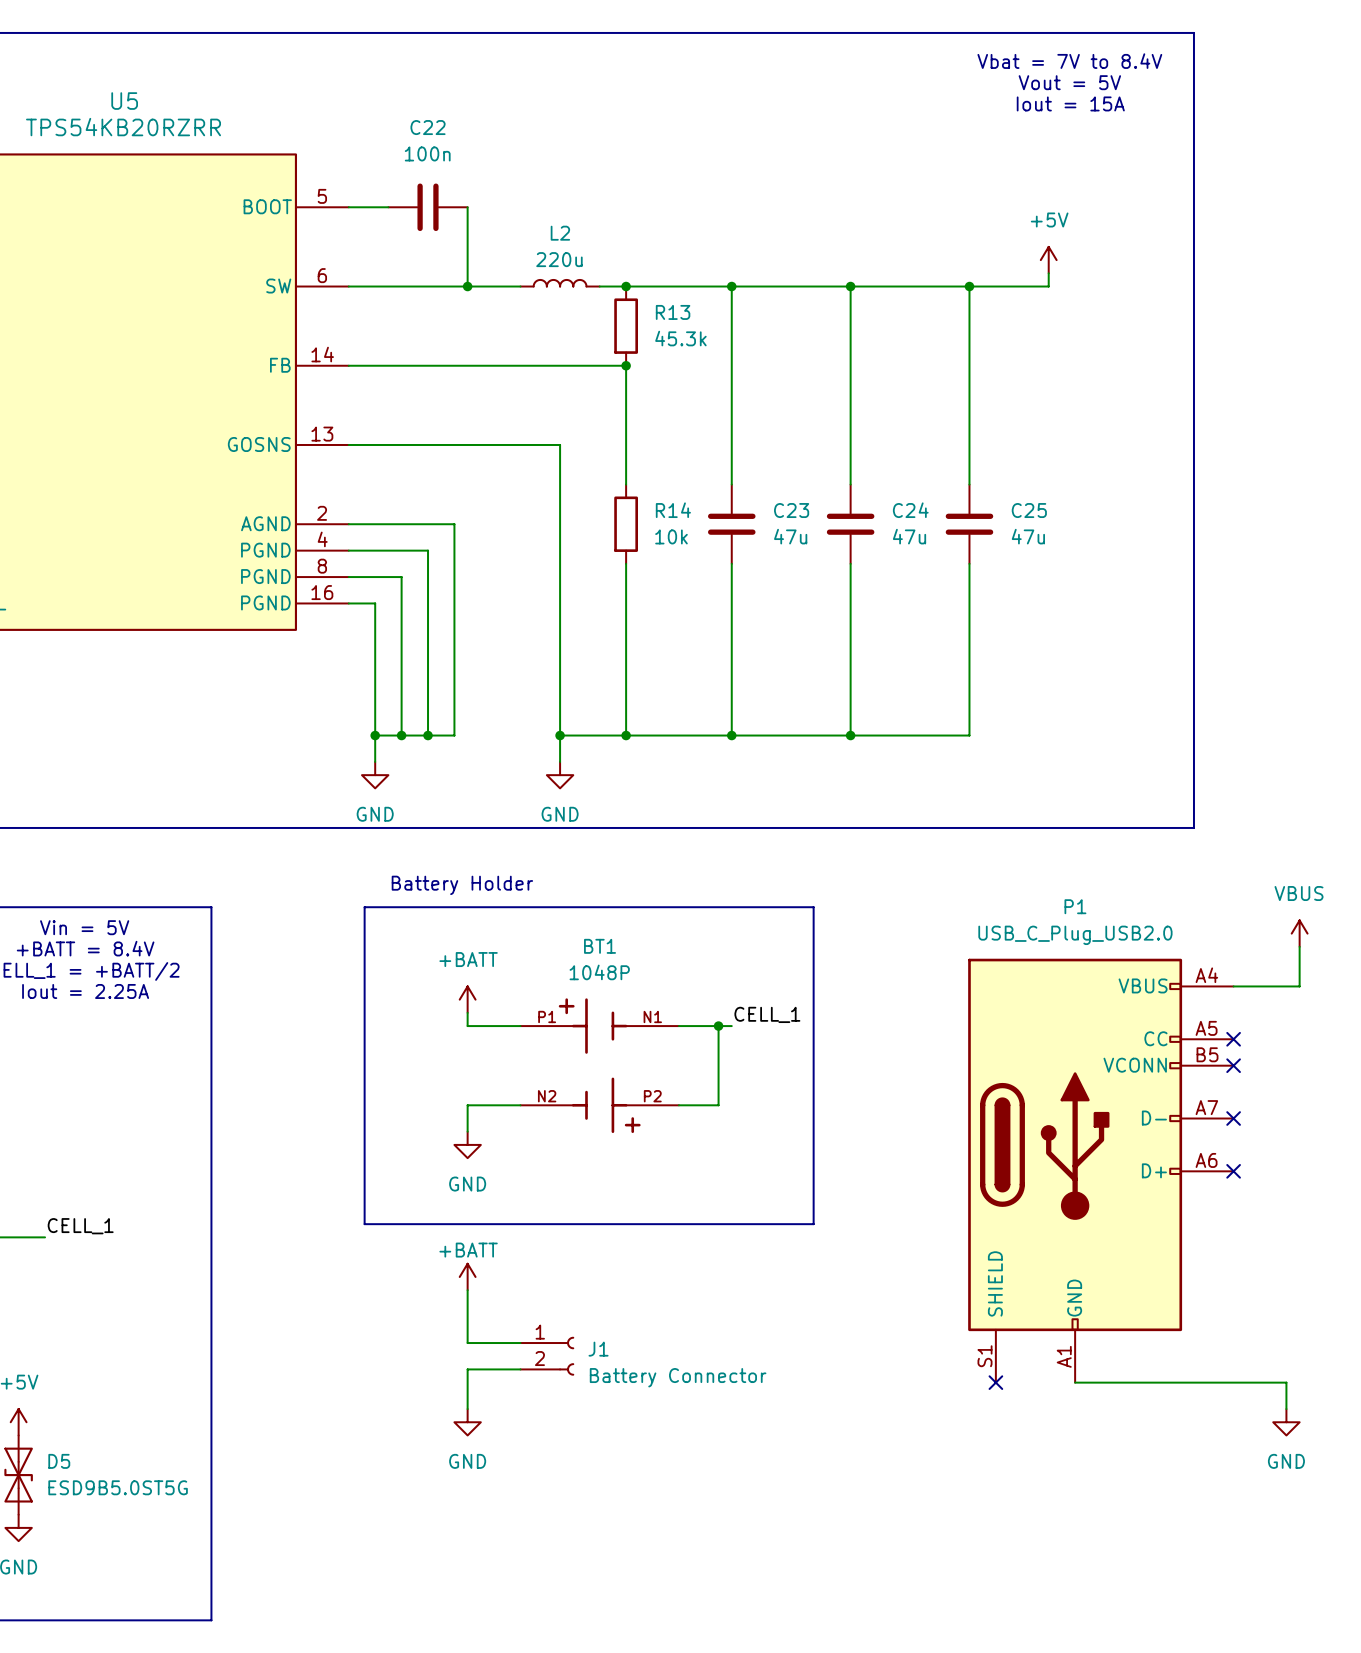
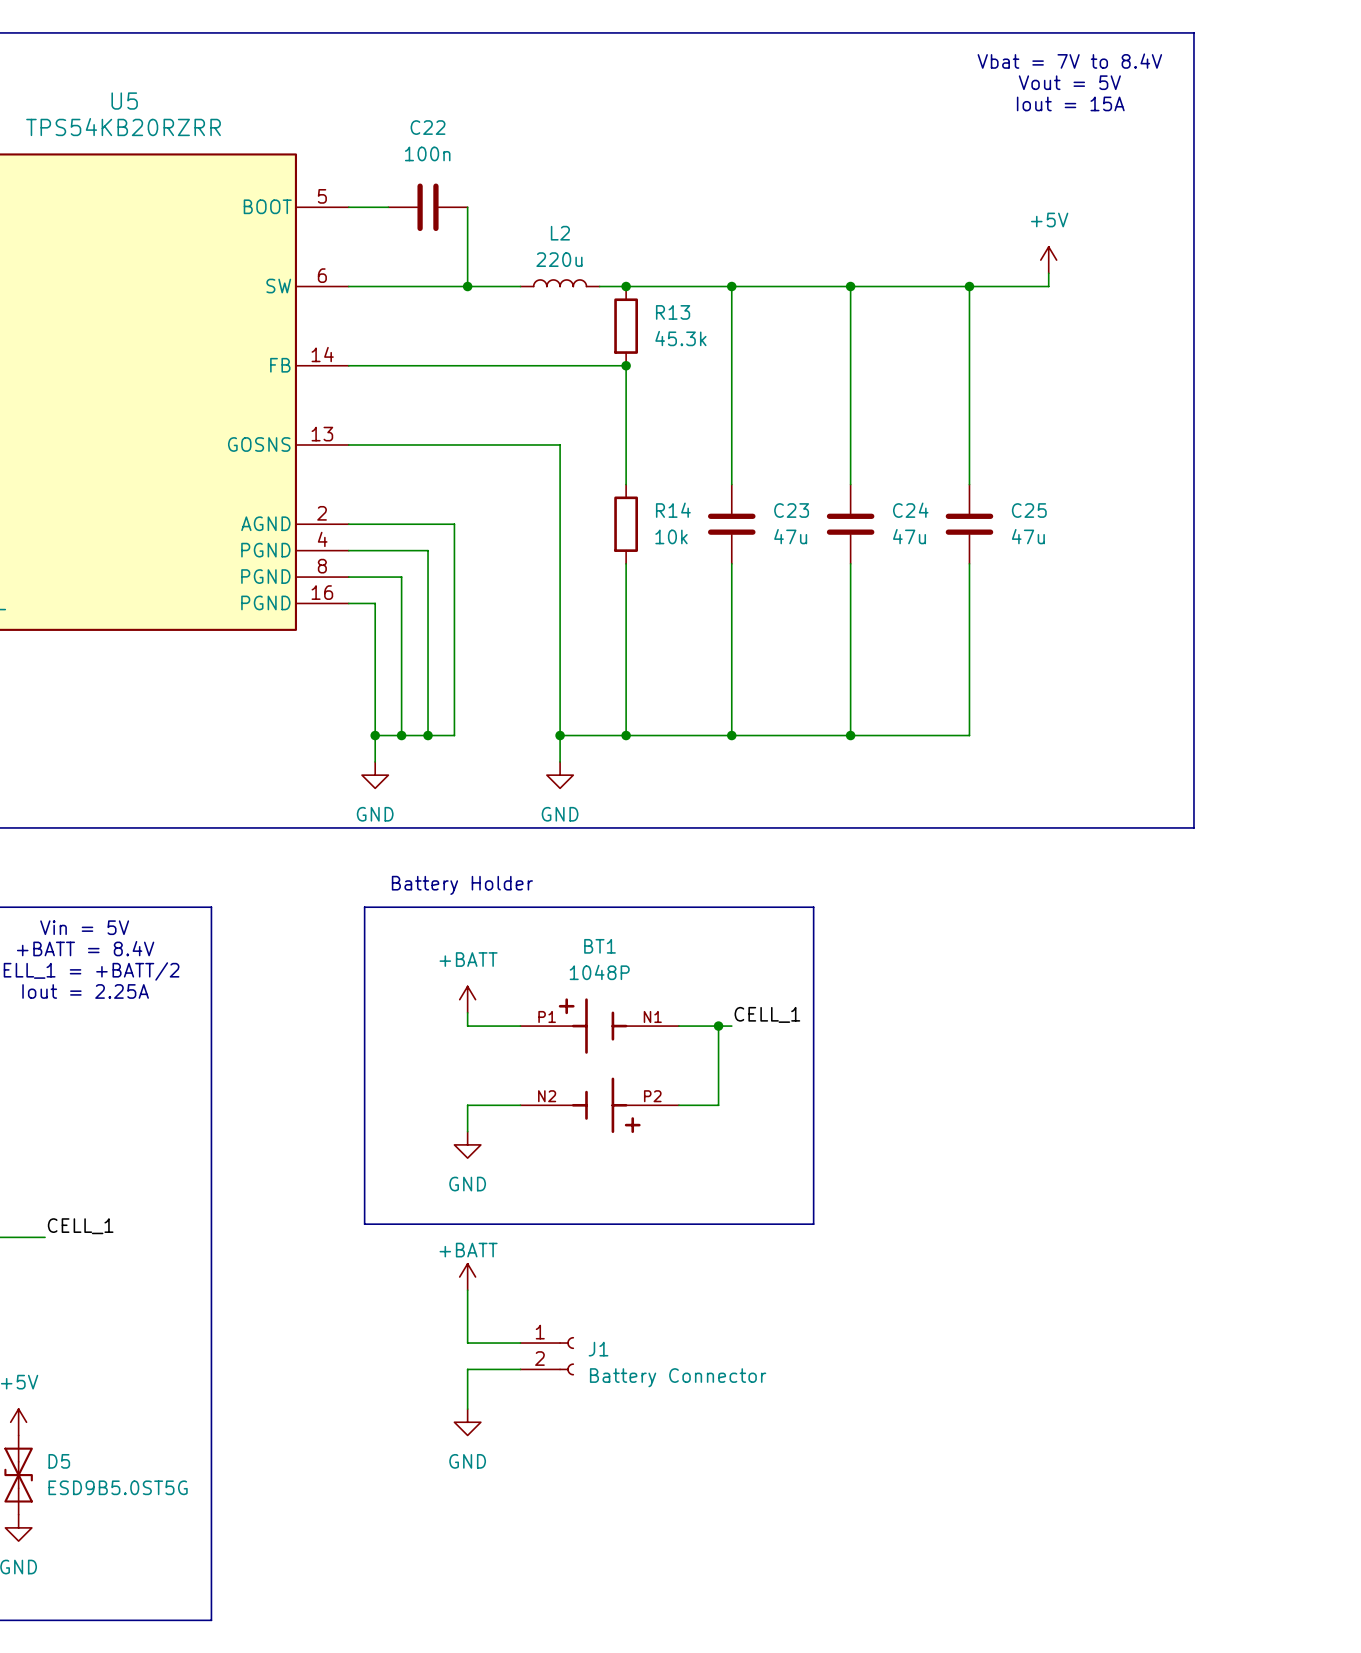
power symbol: VBUS (1299, 933) -> none
wire: (1299, 946) (1299, 986) (1233, 986) -> none
no-connect mark: (1233, 1039) -> none
no-connect mark: (1233, 1065) -> none
no-connect mark: (1233, 1118) -> none
P1: USB_C_Plug_USB2.0 (1100, 1170) -> none
no-connect mark: (1233, 1171) -> none
no-connect mark: (995, 1382) -> none
wire: (1075, 1382) (1286, 1382) (1286, 1409) -> none
power symbol: GND (1286, 1422) -> none

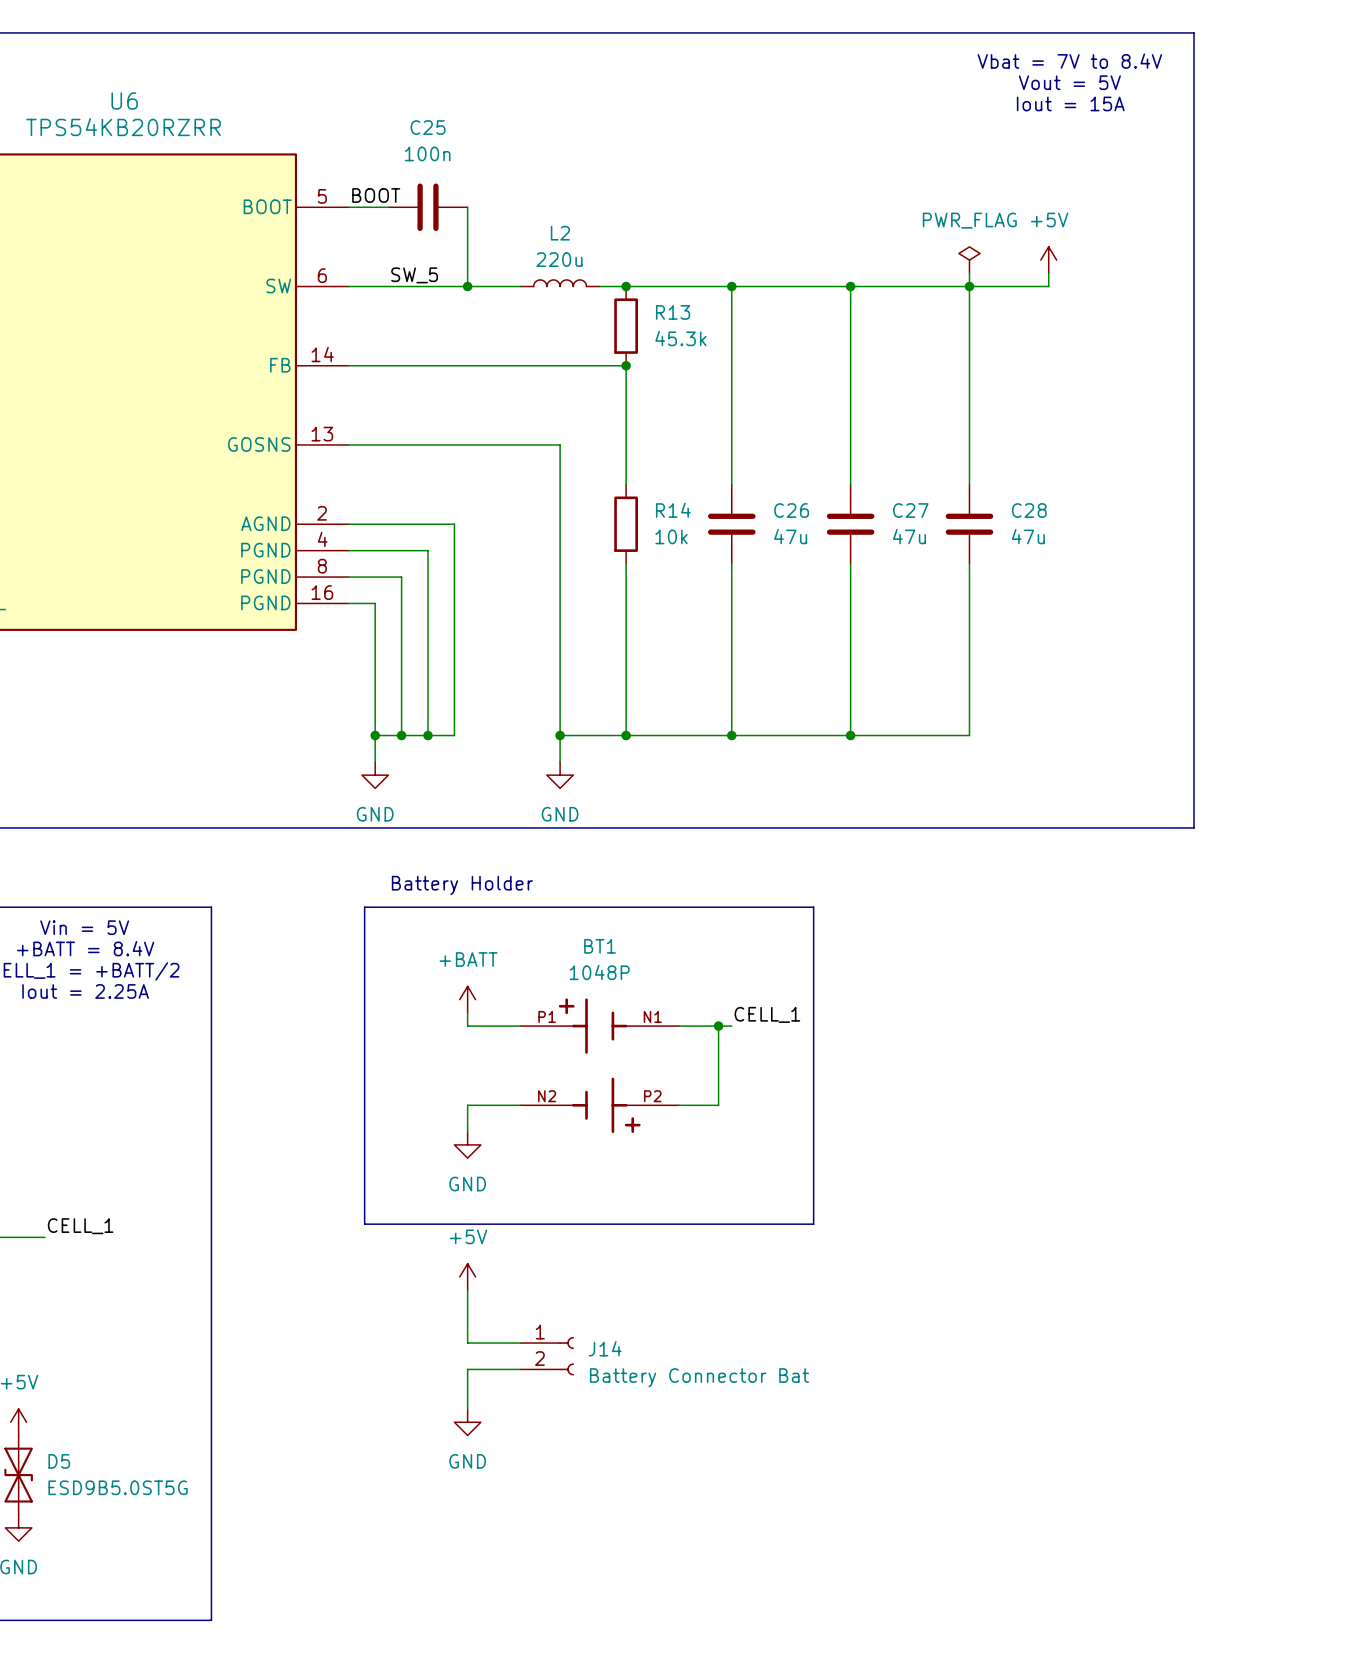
U5 name: U5 (124, 101) -> U6 (124, 101)
C22 name: C22 (428, 127) -> C25 (428, 127)
label: none -> BOOT (376, 195)
power symbol: none -> PWR_FLAG (969, 260)
wire: none -> (969, 273) (969, 286)
label: none -> SW_5 (414, 275)
C23 name: C23 (791, 510) -> C26 (791, 510)
C24 name: C24 (910, 510) -> C27 (910, 510)
C25 name: C25 (1029, 510) -> C28 (1029, 510)
power symbol: +BATT (467, 1276) -> +5V (467, 1276)
J1 name: J1 (598, 1349) -> J14 (605, 1348)
J1 value: Battery Connector (678, 1377) -> Battery Connector Bat (699, 1377)

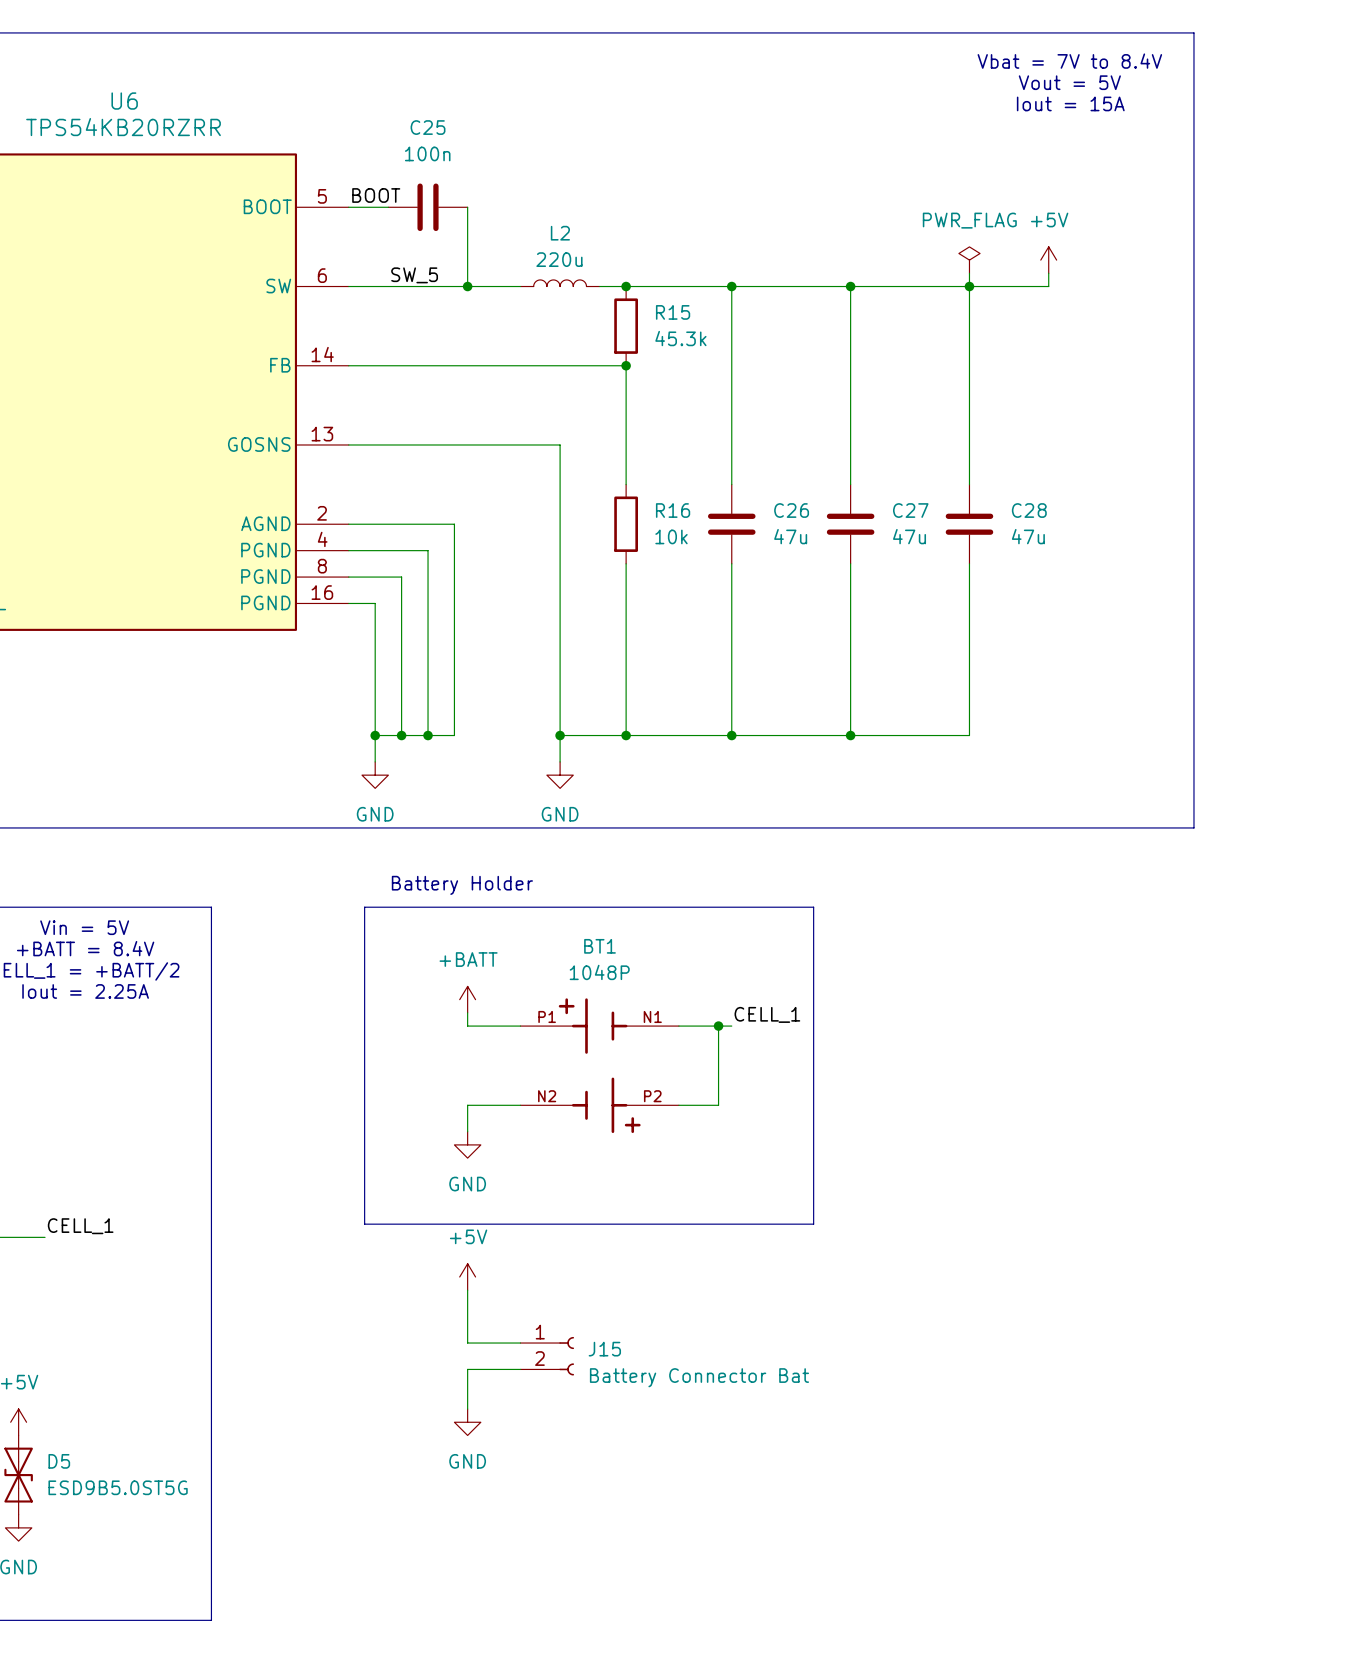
R13 name: R13 (673, 312) -> R15 (673, 312)
R14 name: R14 (673, 510) -> R16 (673, 510)
J14 name: J14 (605, 1348) -> J15 (604, 1349)

